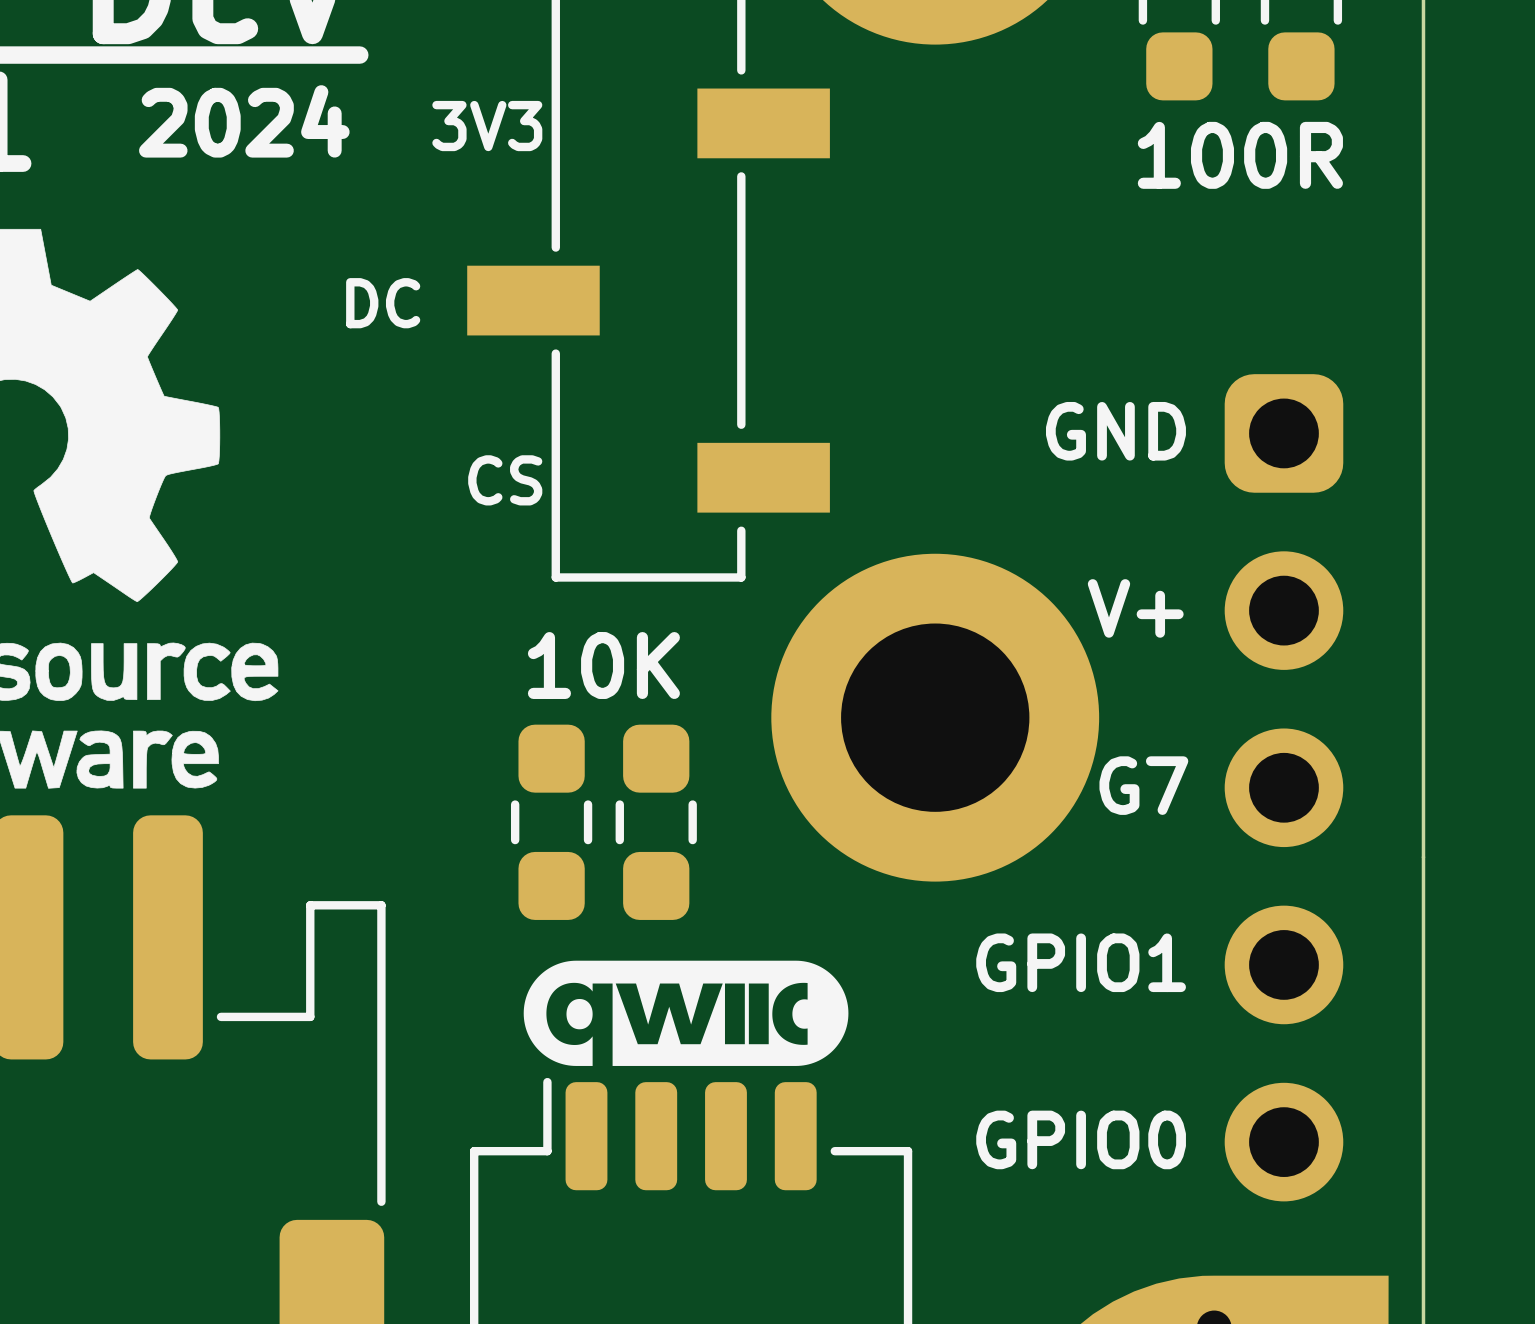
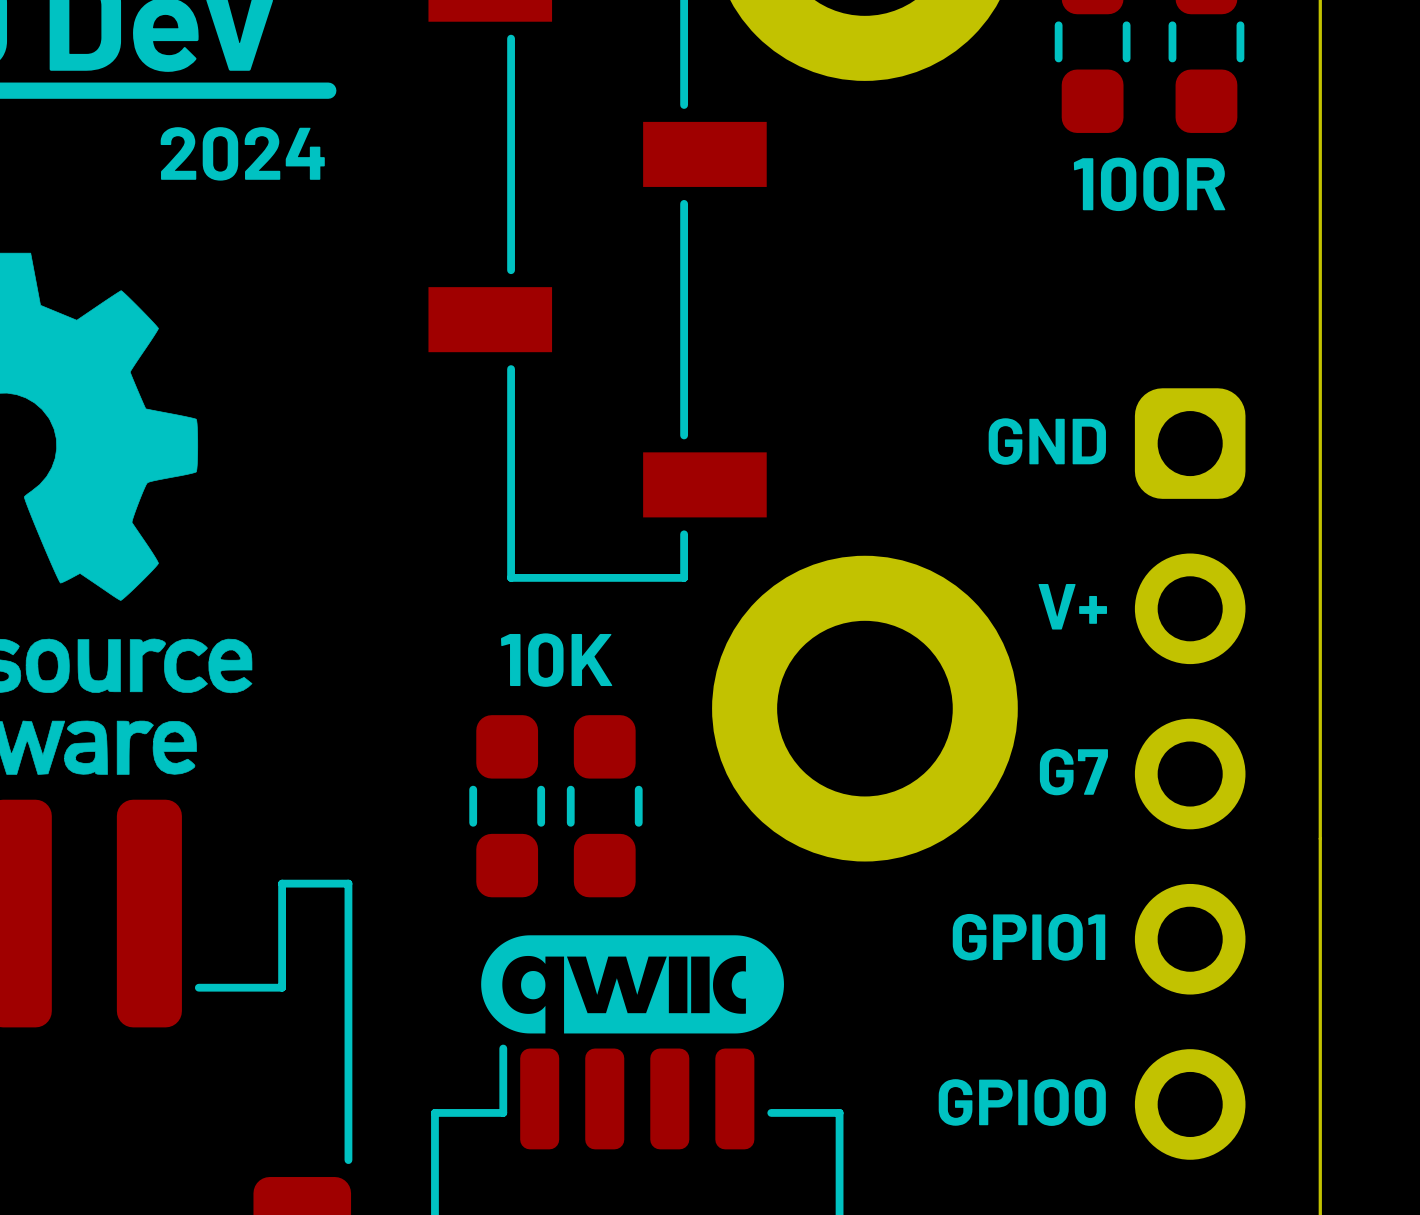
text: 3V3 (487, 126) -> none
text: DC (383, 303) -> none
text: CS (505, 480) -> none

